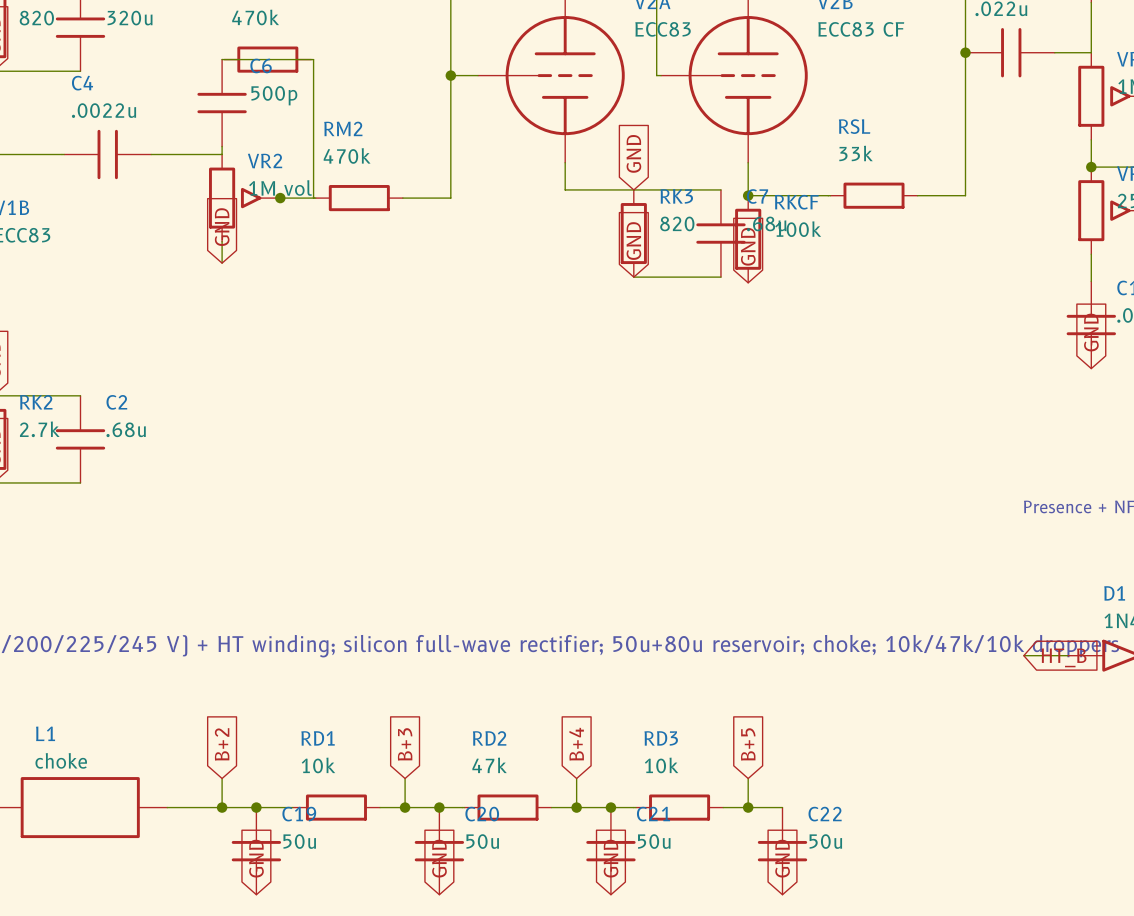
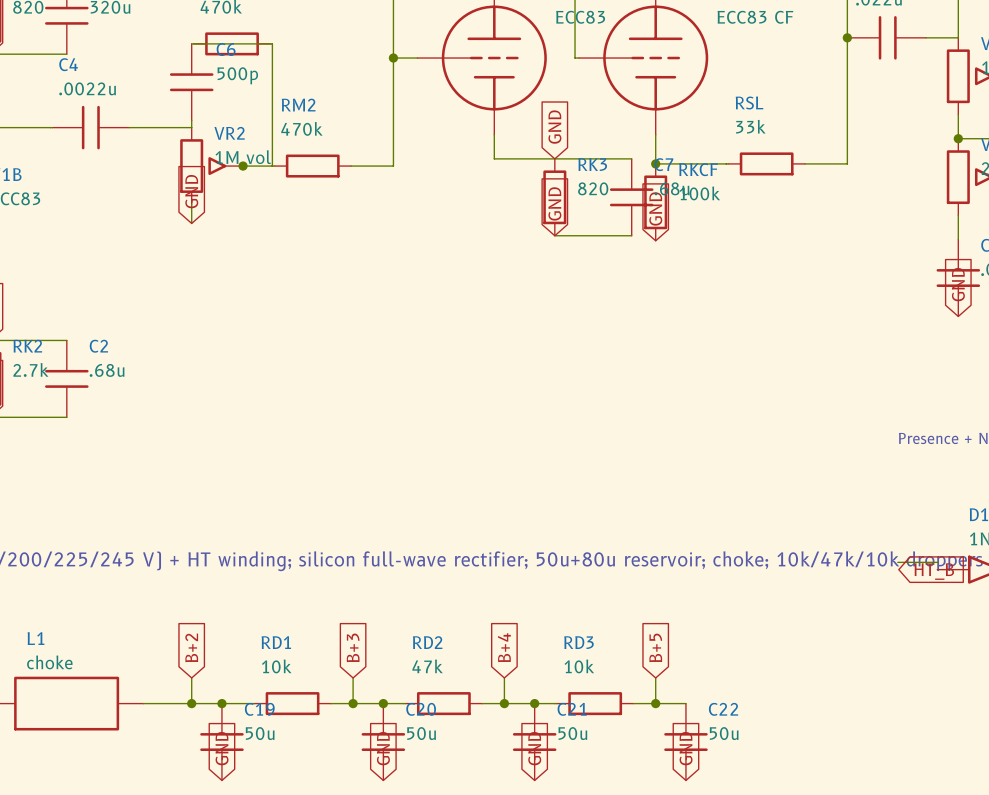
wire: none -> (897, 562) (938, 562)
wire: (1023, 655) (1067, 655) -> none

